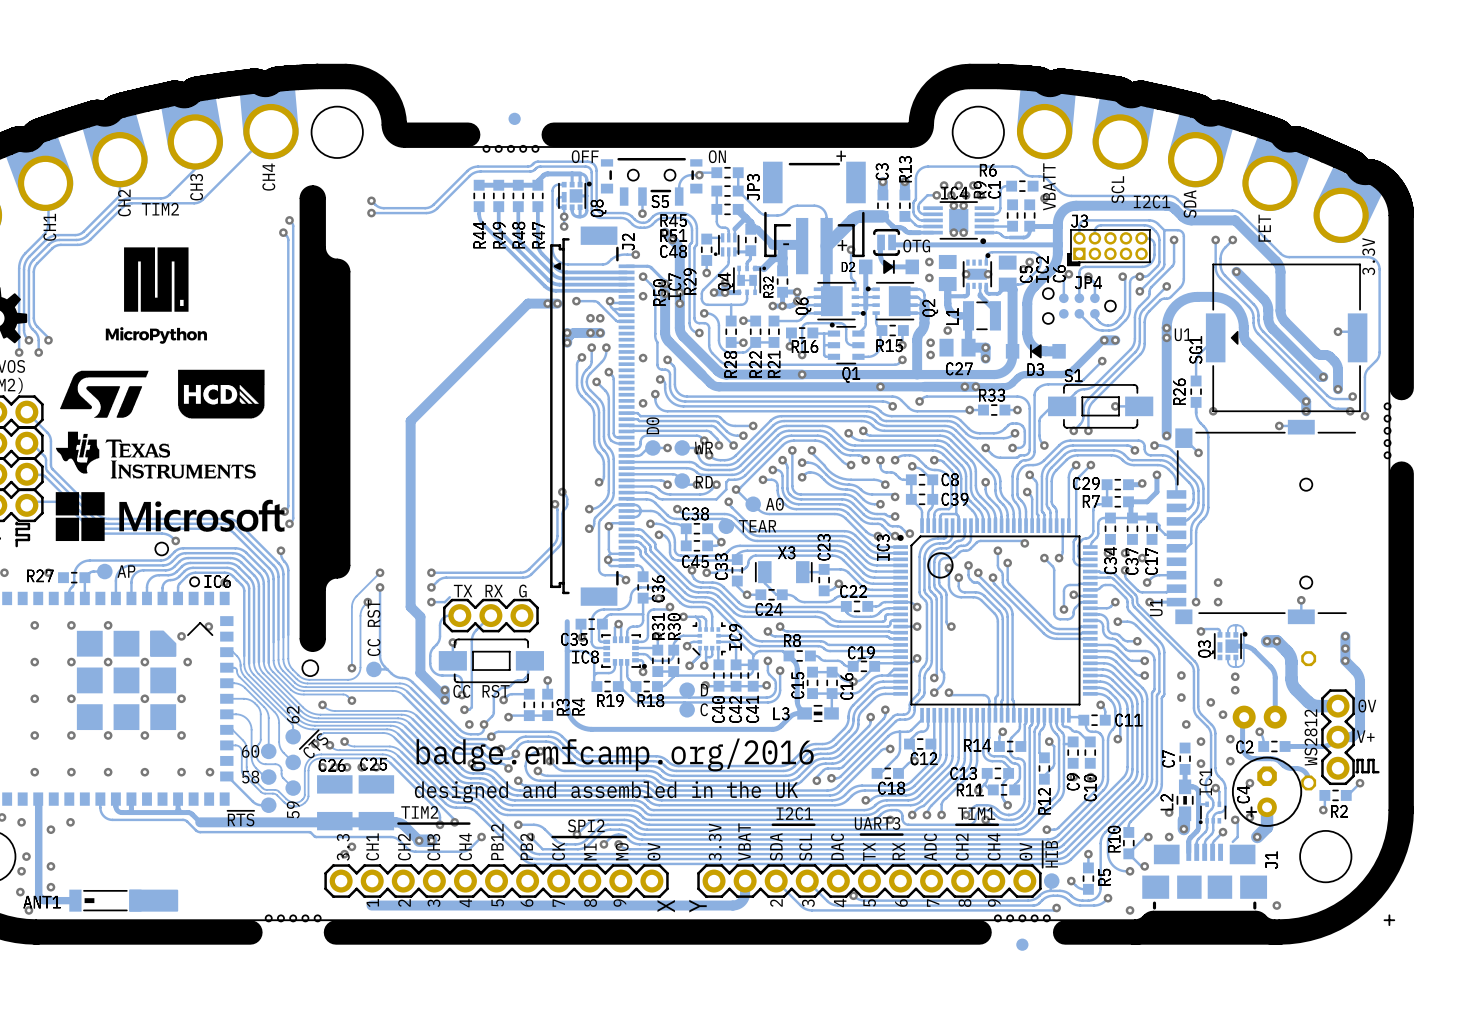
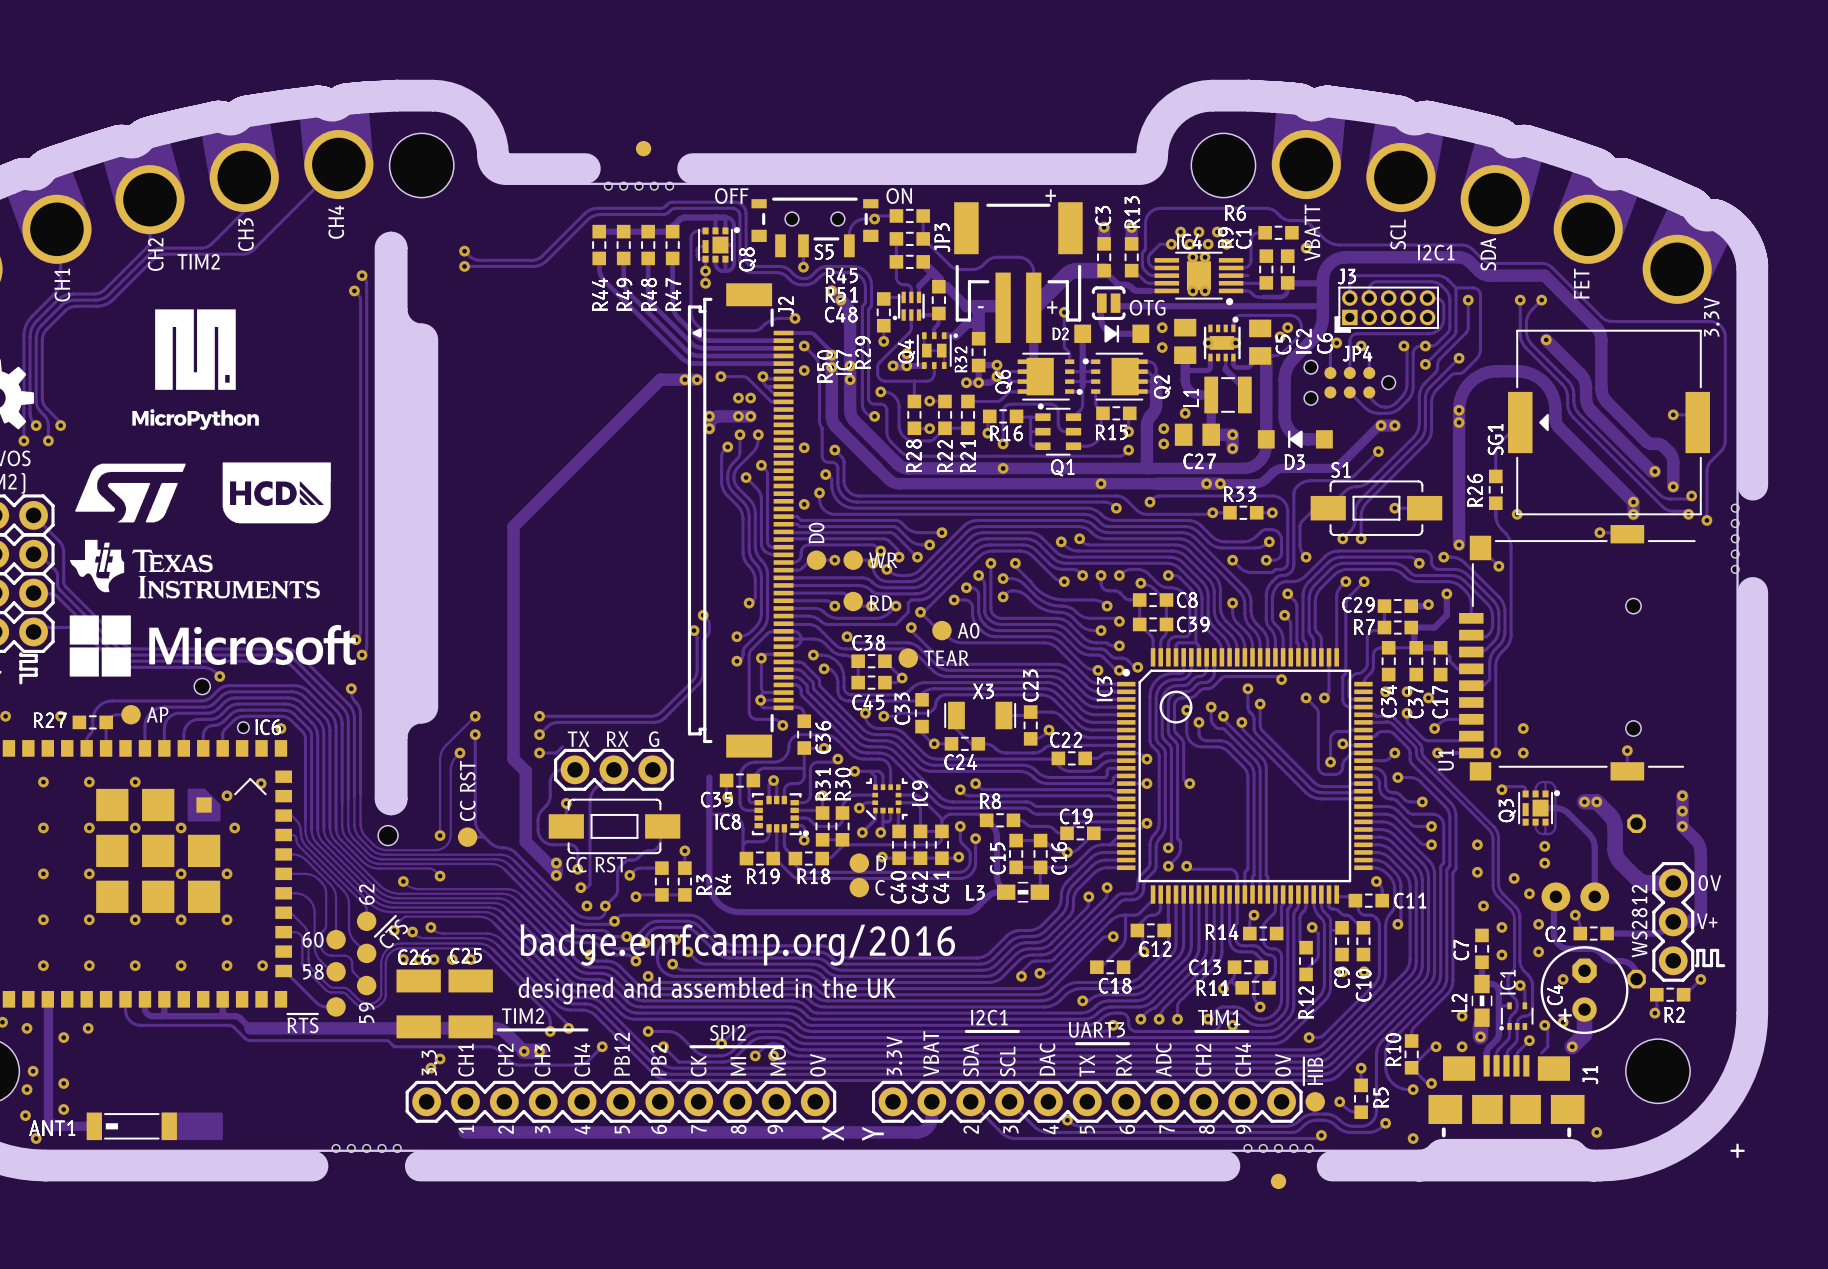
U1 name rotation: 0° (1183, 334) -> 90° counterclockwise (1446, 760)
U1 name position: U1 (1183, 334) -> U1 (1446, 760)

